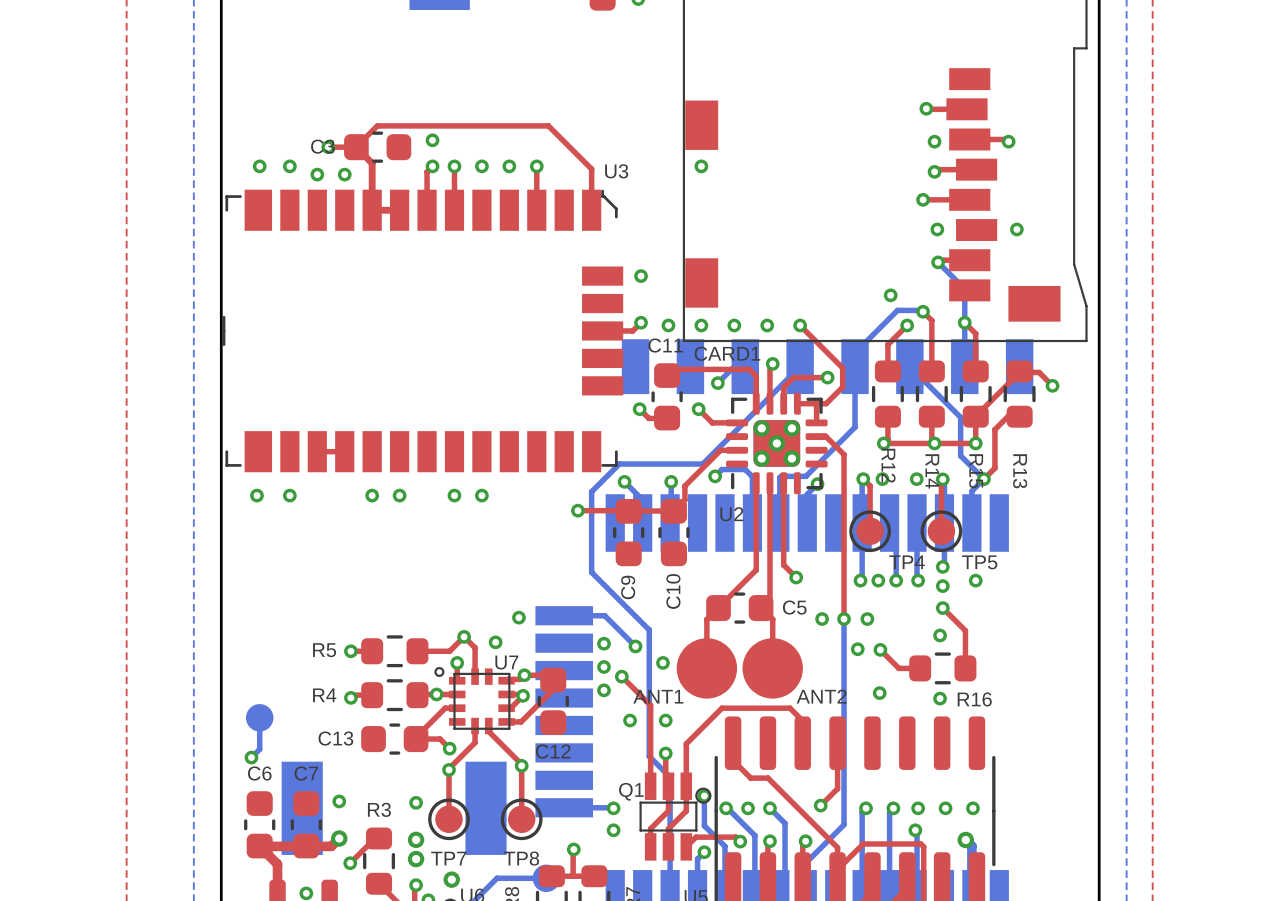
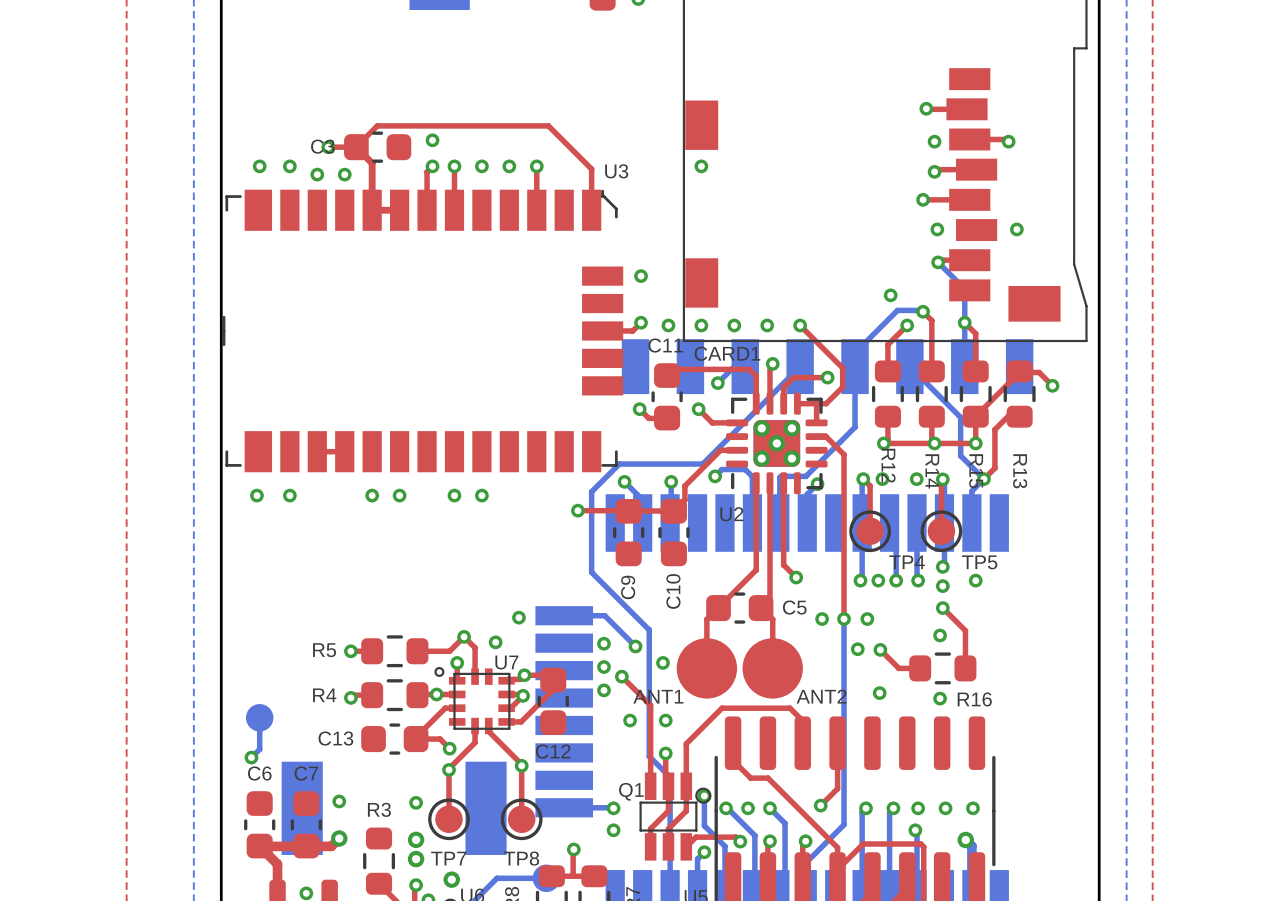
top track: (379, 838) (374, 838) (350, 863) -> none
via: (350, 863) -> none

